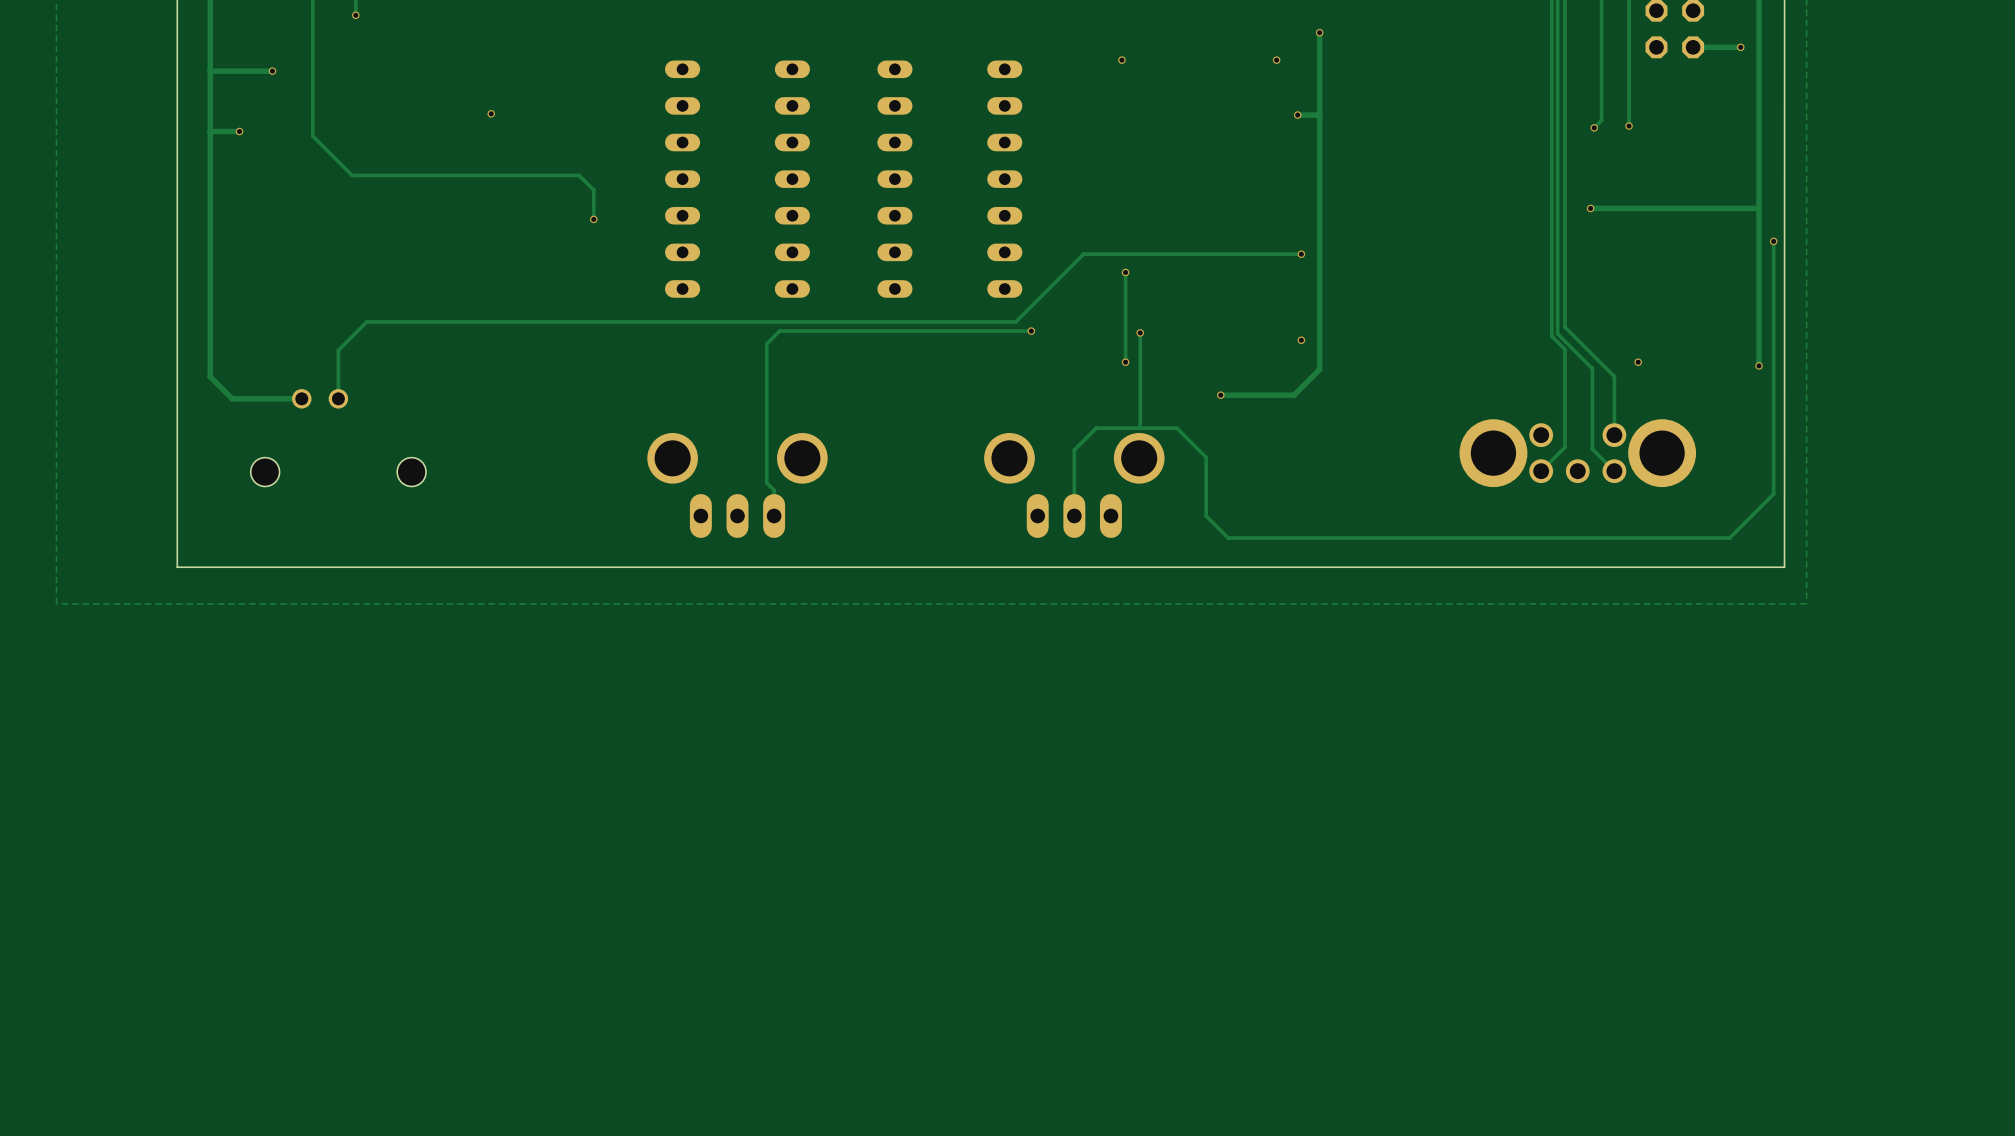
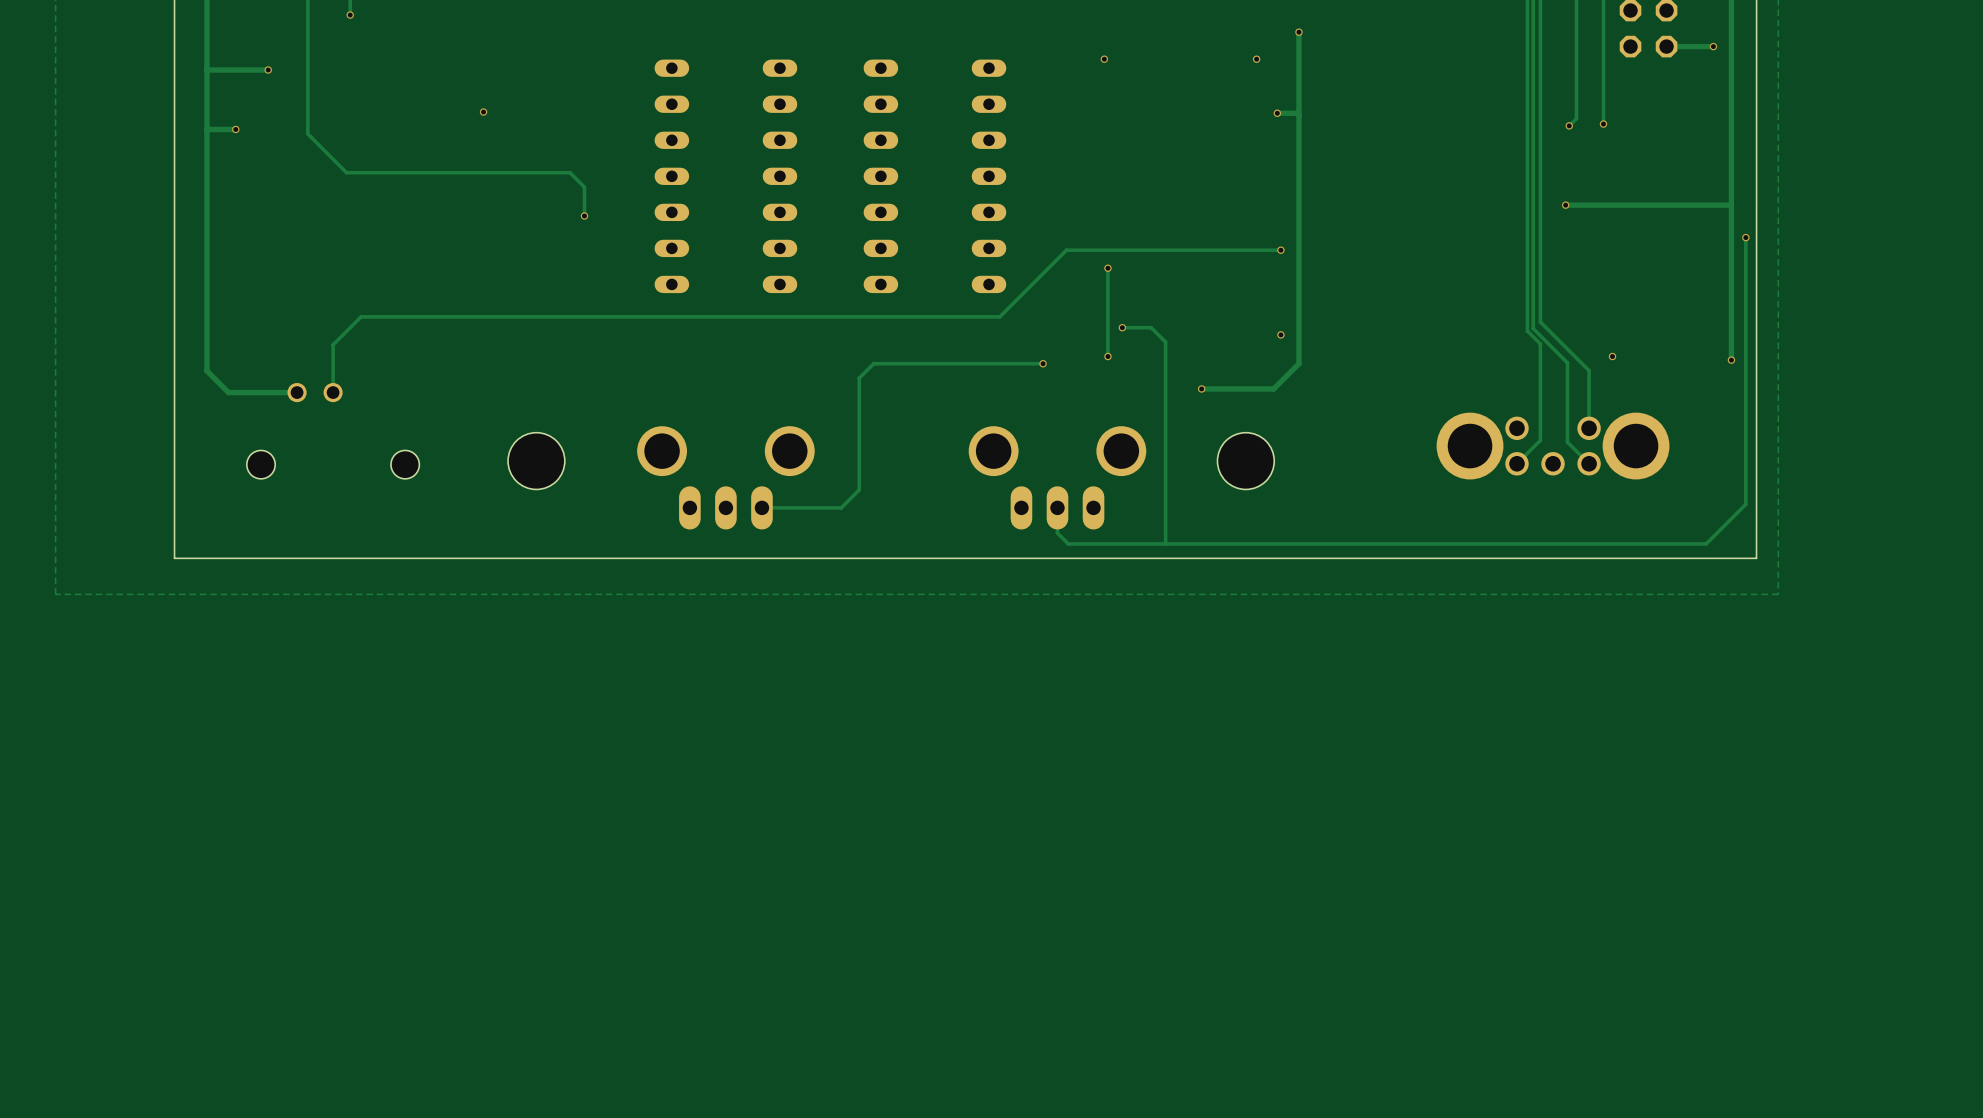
track: (1031, 331) (779, 331) (766, 343) (766, 483) (774, 490) (774, 515) -> (1043, 363) (873, 363) (859, 378) (859, 489) (841, 507) (761, 507)
via position: (1031, 331) -> (1043, 363)
track: (1140, 332) (1140, 428) -> (1122, 327) (1151, 327) (1165, 342) (1165, 543)
hole: none -> (536, 461)
hole: none -> (1245, 461)
track: (1773, 494) (1729, 537) (1228, 537) (1206, 515) (1206, 457) (1176, 428) (1096, 428) (1074, 450) (1074, 515) -> (1745, 486) (1745, 504) (1706, 543) (1068, 543) (1057, 533) (1057, 507)

